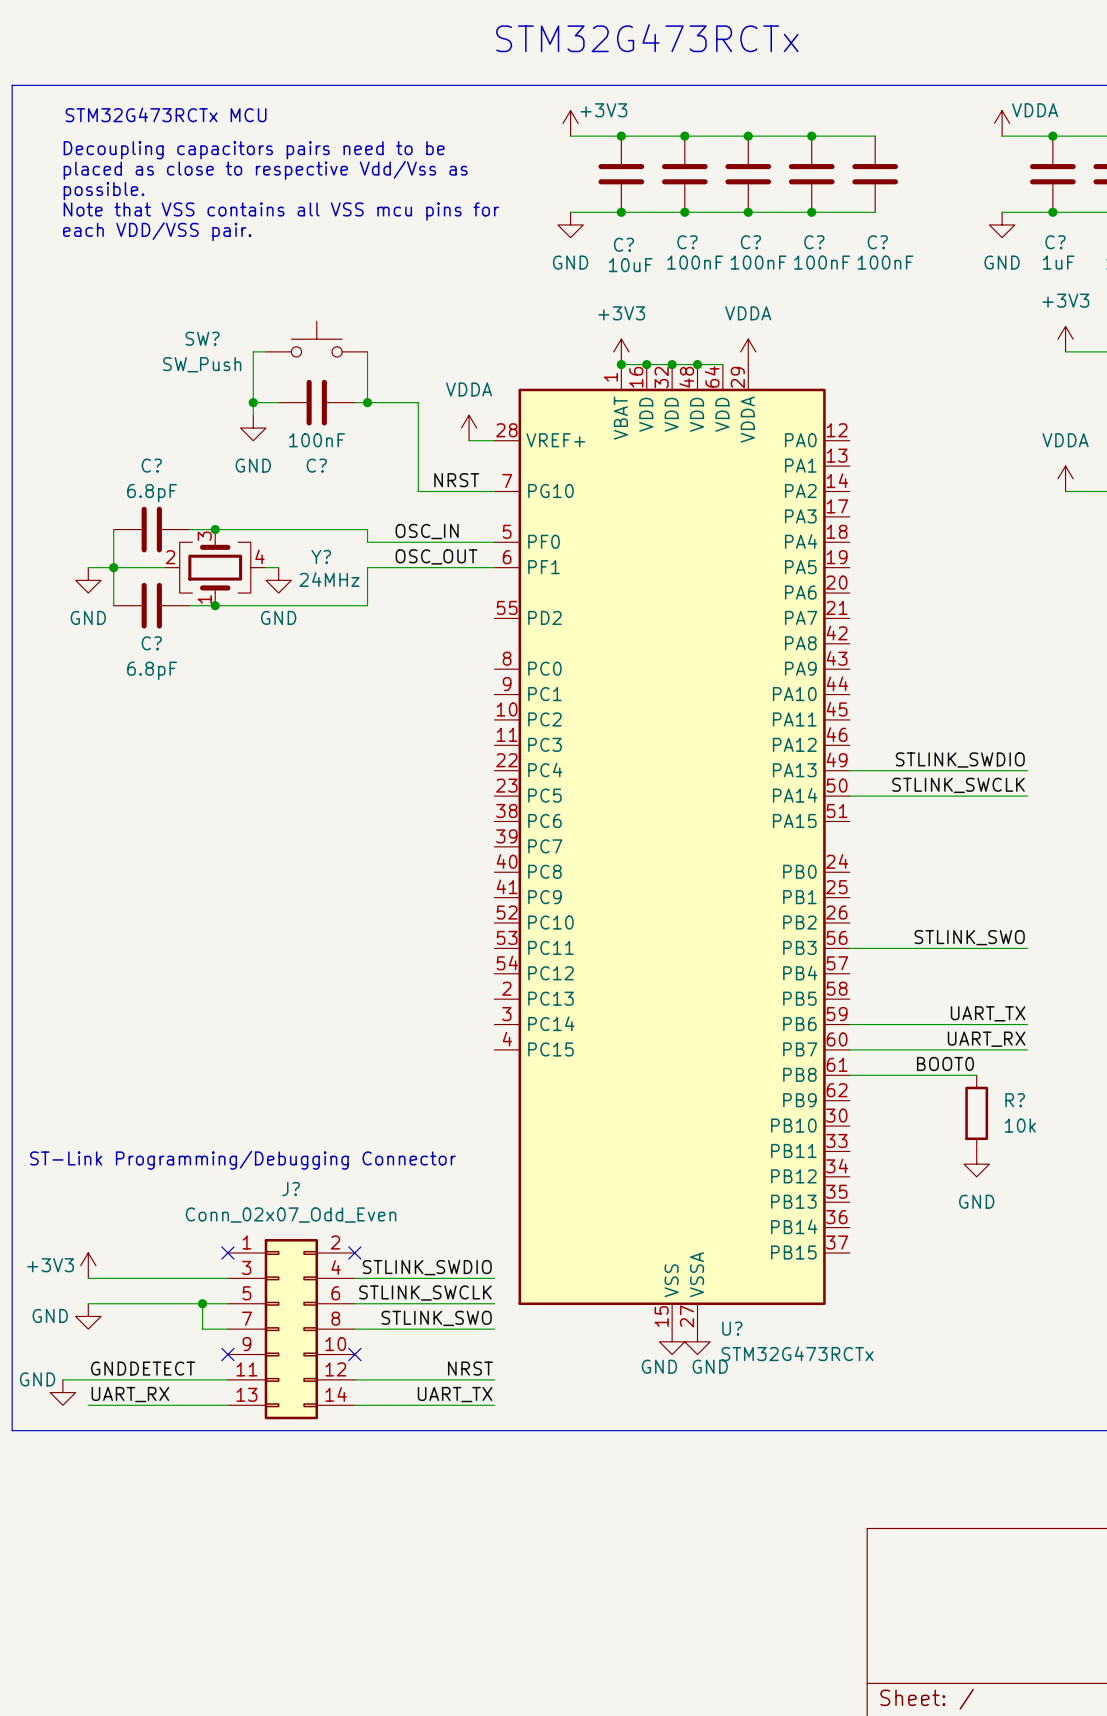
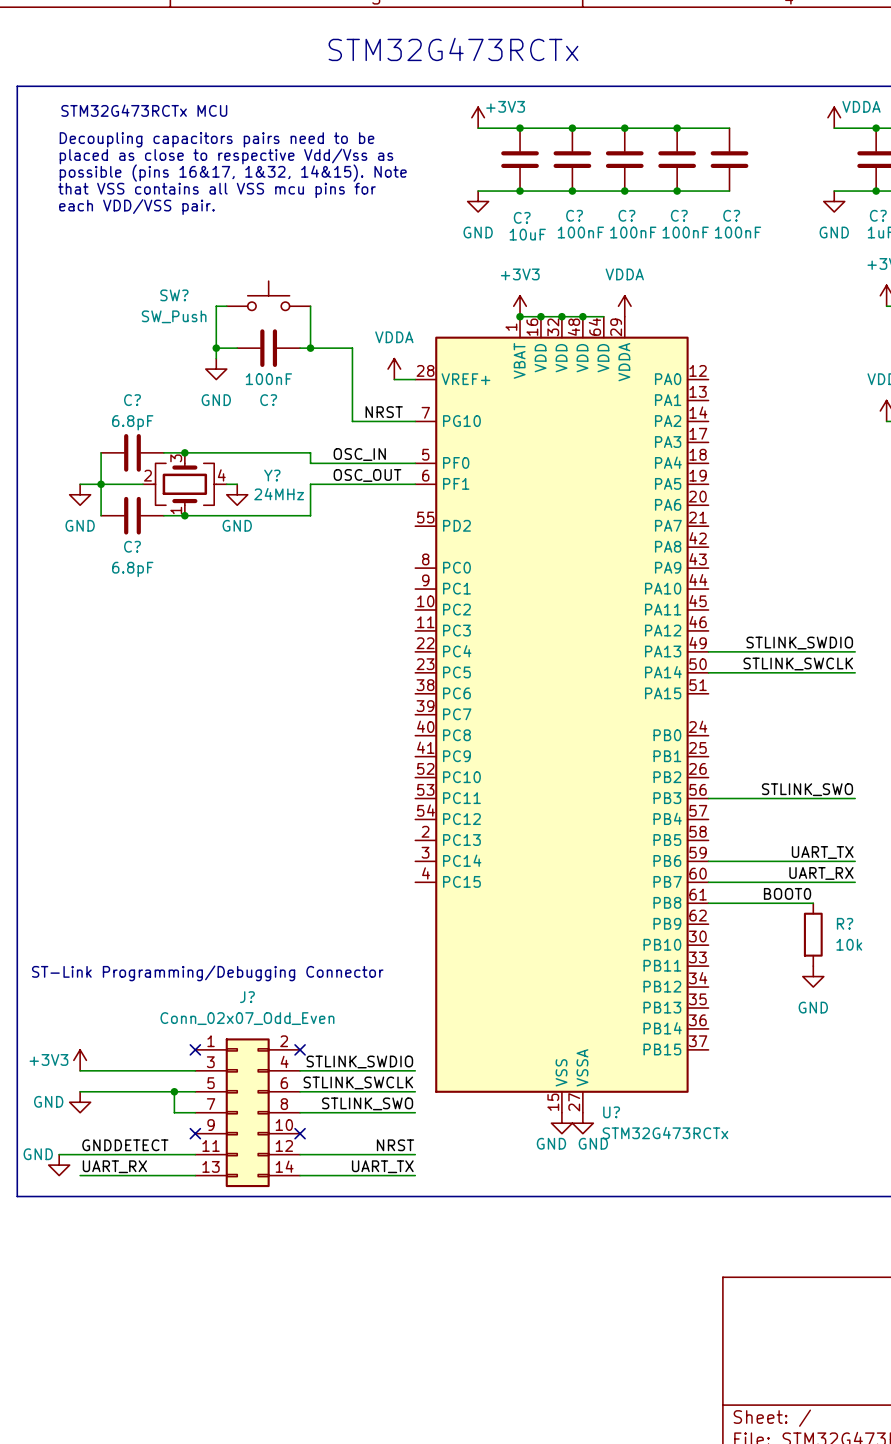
text position: STM32G473RCTx (647, 38) -> STM32G473RCTx (453, 49)
text: possible. (103, 191) -> possible (pins 16&17, 1&32, 14&15). Note (233, 173)
text: Note that VSS contains all VSS mcu pins for (281, 211) -> that VSS contains all VSS mcu pins for (217, 190)

